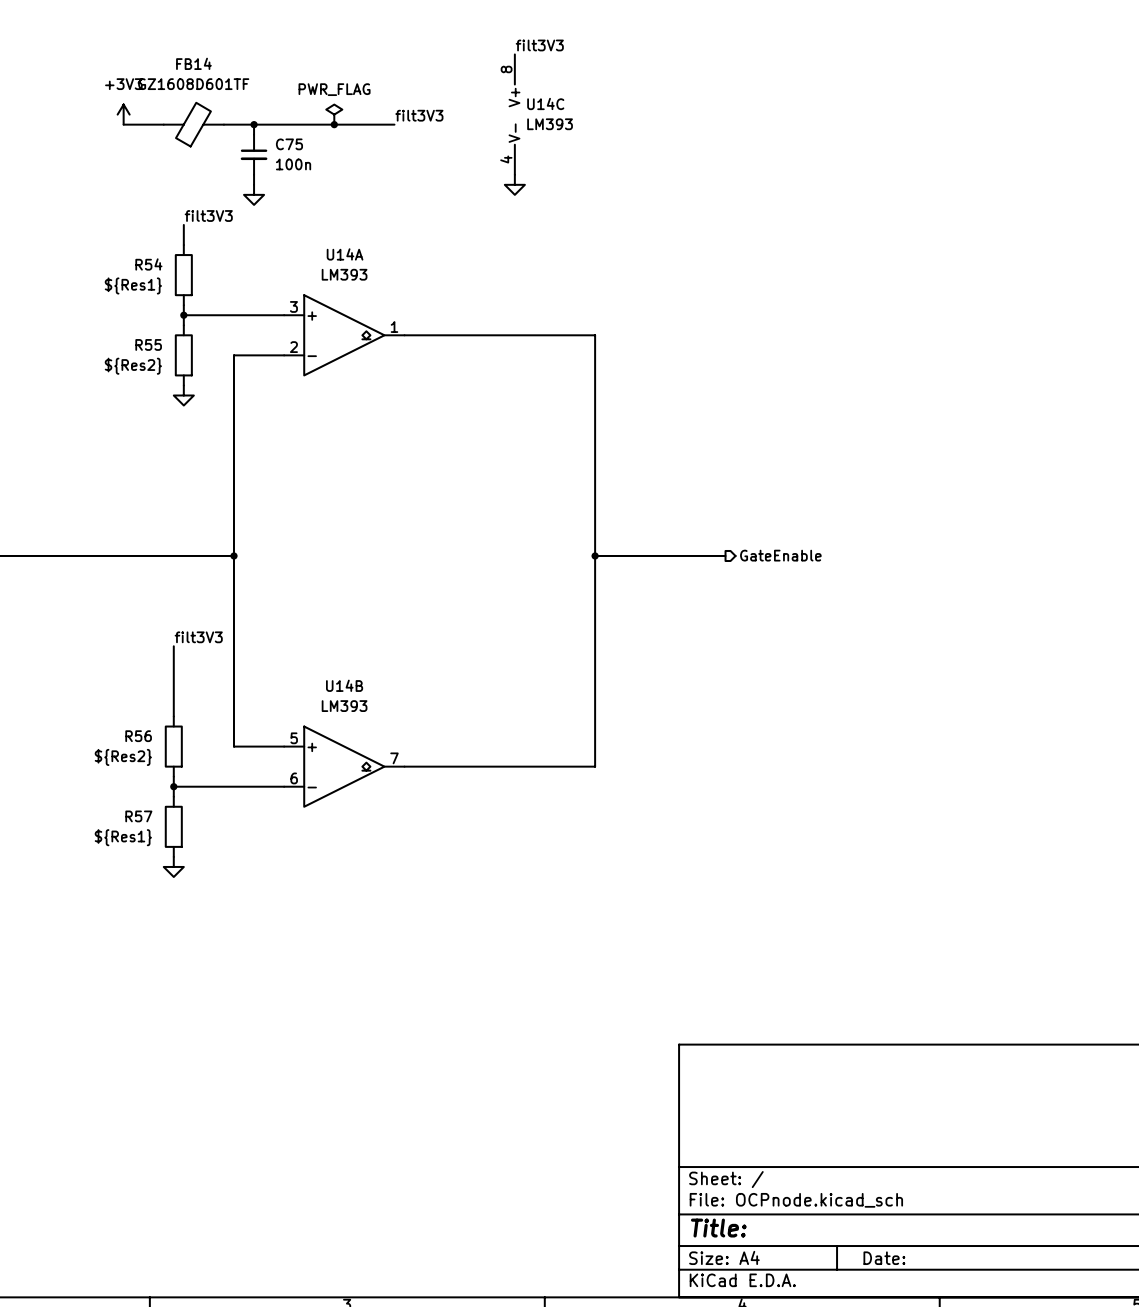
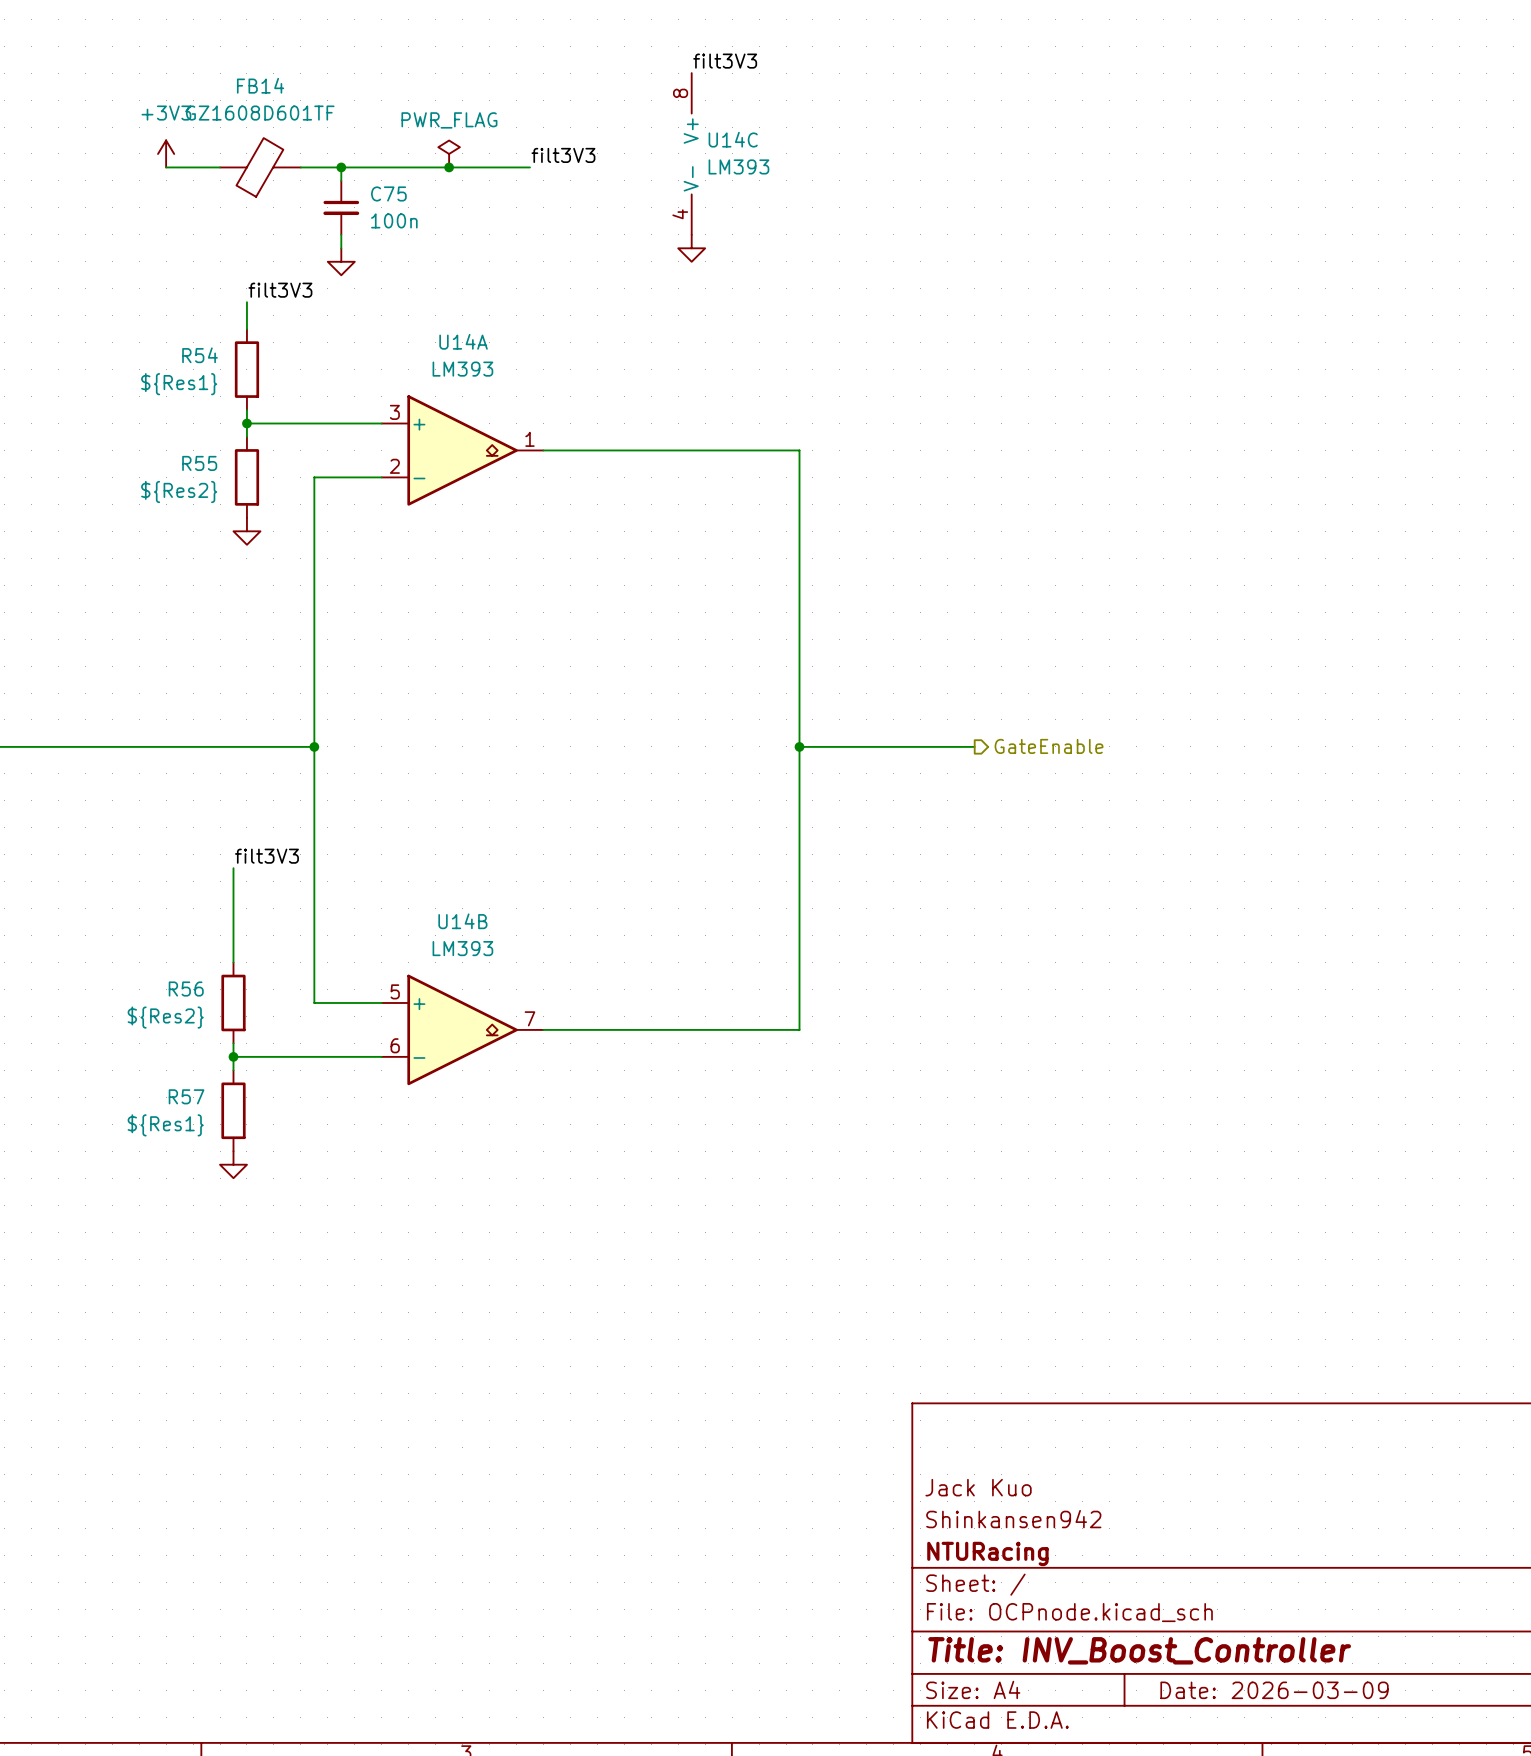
title block: none -> Jack Kuo (978, 1487)
title block: none -> Shinkansen942 (1013, 1519)
title block: none -> NTURacing (987, 1553)
title block: Title: (718, 1228) -> Title: INV_Boost_Controller (1139, 1650)
title block: Date: (884, 1258) -> Date: 2026-03-09 (1274, 1690)

